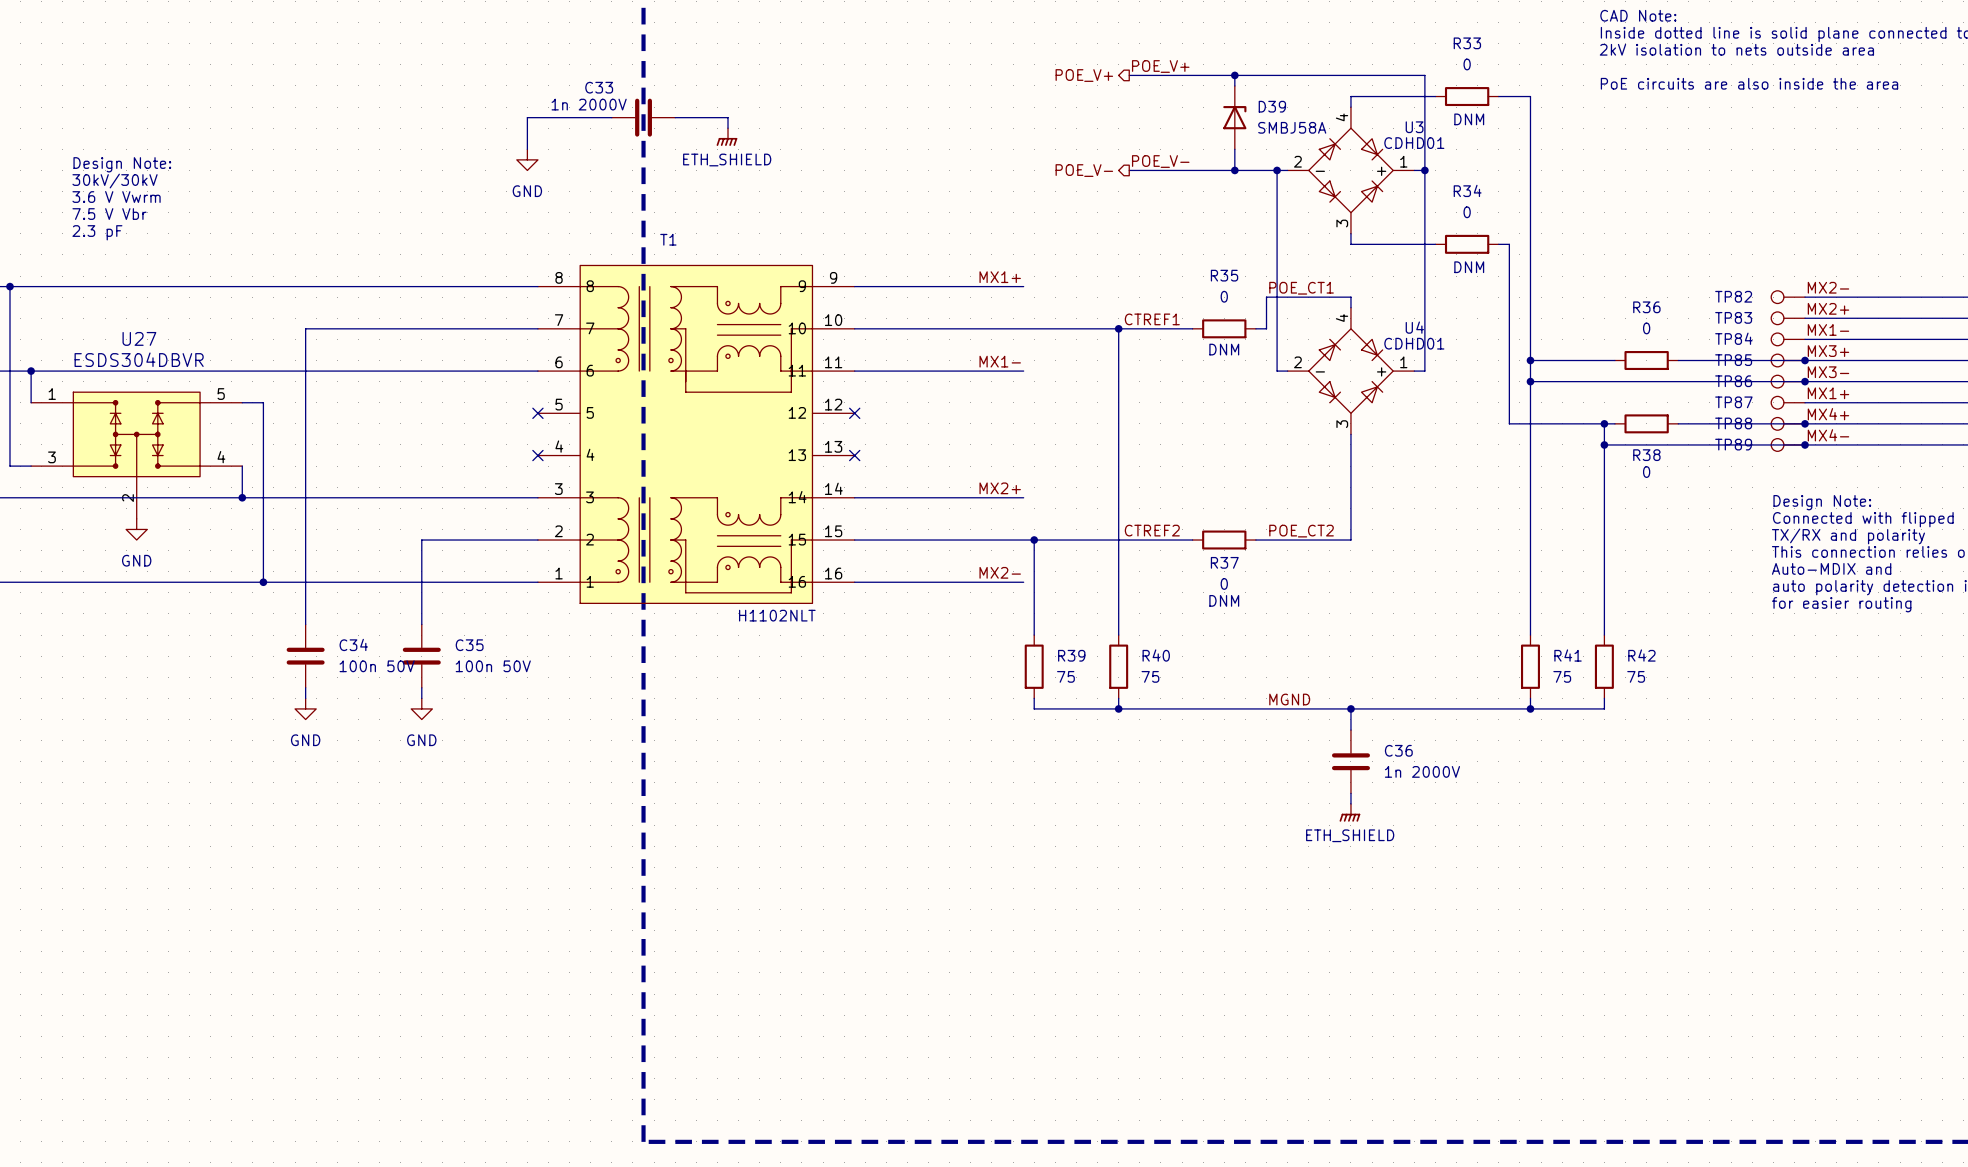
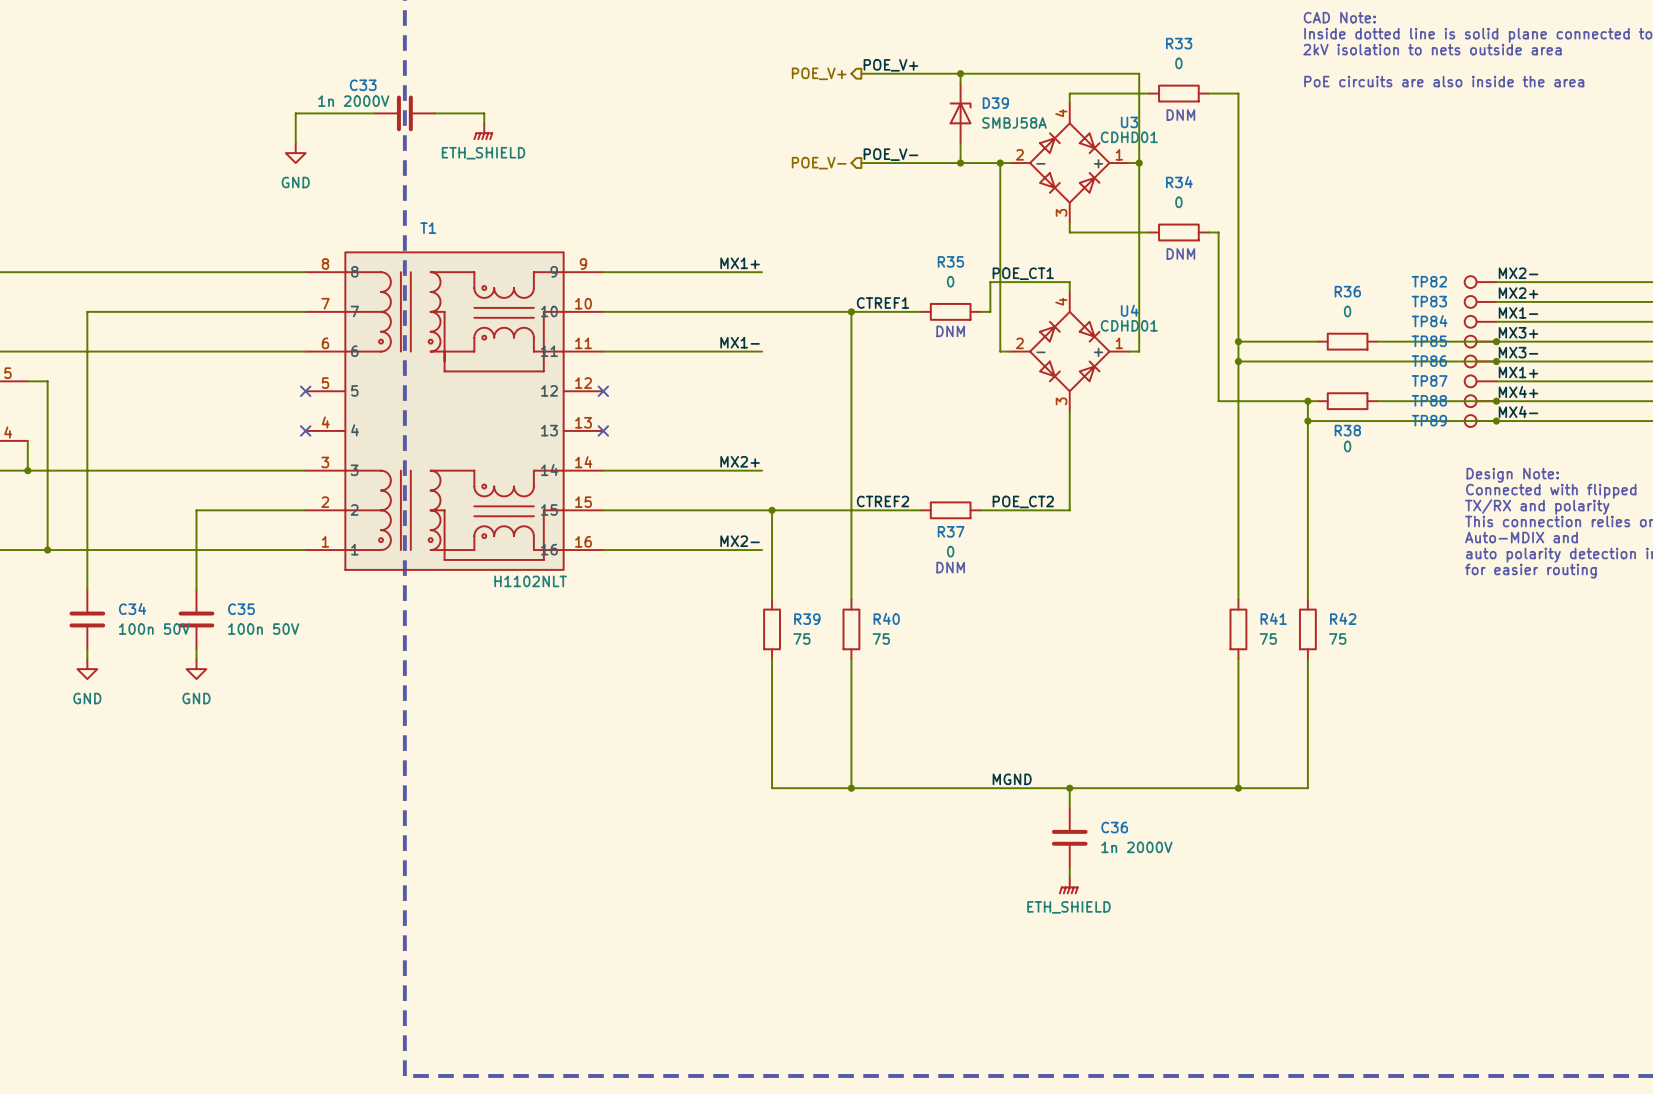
label position: MGND (1289, 699) -> MGND (1012, 779)
wire: (1034, 708) (1604, 708) -> (772, 669) (772, 788) (1307, 788) (1307, 669)
wire: none -> (851, 669) (851, 788)
junction: (1118, 708) -> none
wire: (1350, 708) (1350, 730) -> (1069, 788) (1069, 808)
junction: (1350, 708) -> none
wire: none -> (1238, 669) (1238, 788)
junction: (1530, 708) -> none
C36 position: (1350, 761) -> (1069, 837)
wire: (1350, 793) (1350, 803) -> (1069, 867) (1069, 877)
power symbol position: ETH_SHIELD (1349, 812) -> ETH_SHIELD (1068, 885)
junction: none -> (851, 788)
junction: none -> (1069, 788)
junction: none -> (1238, 788)

